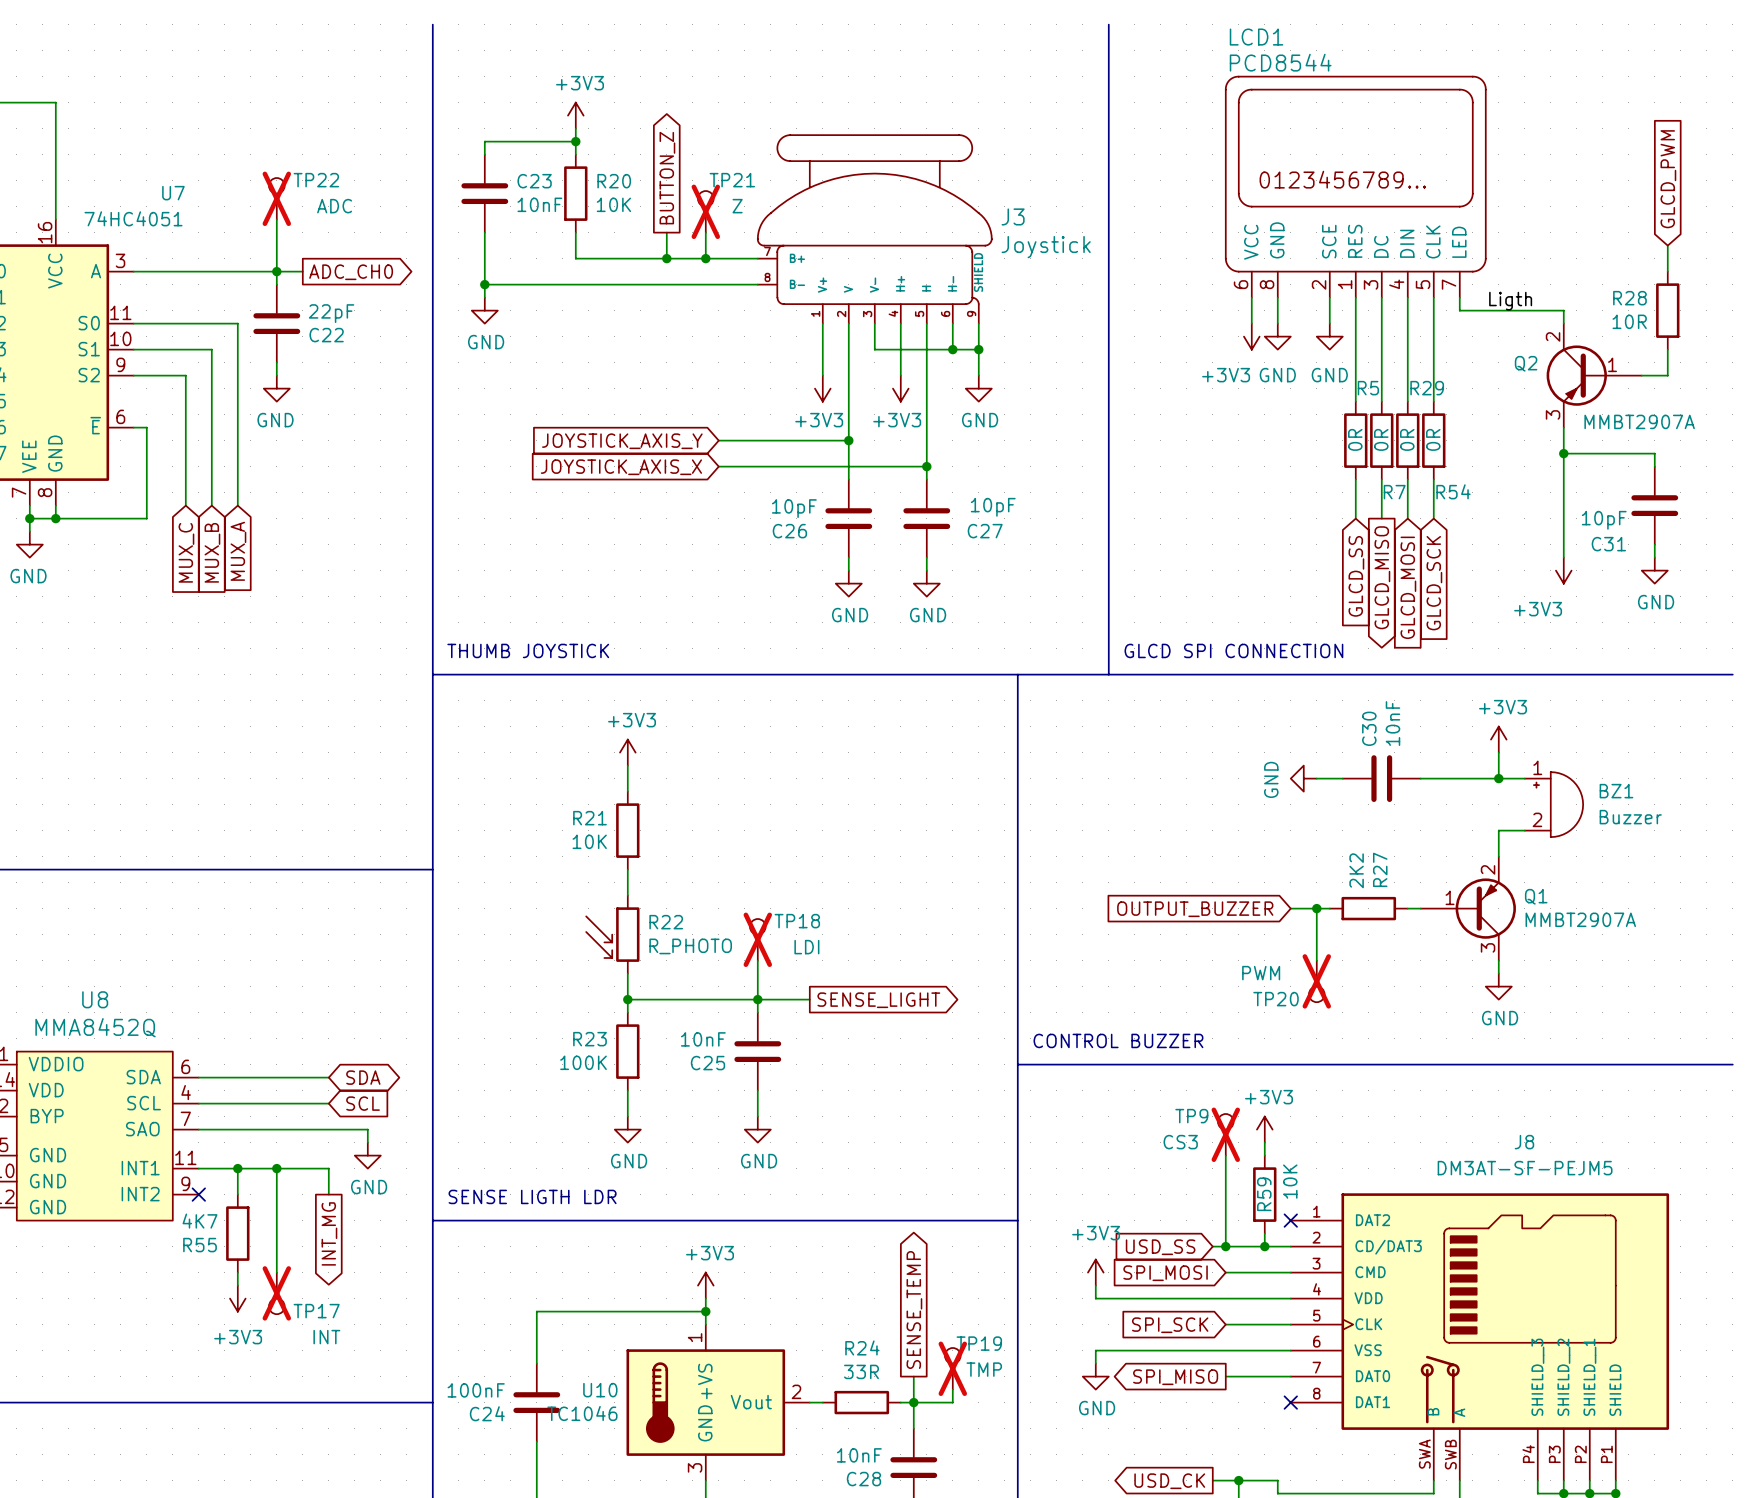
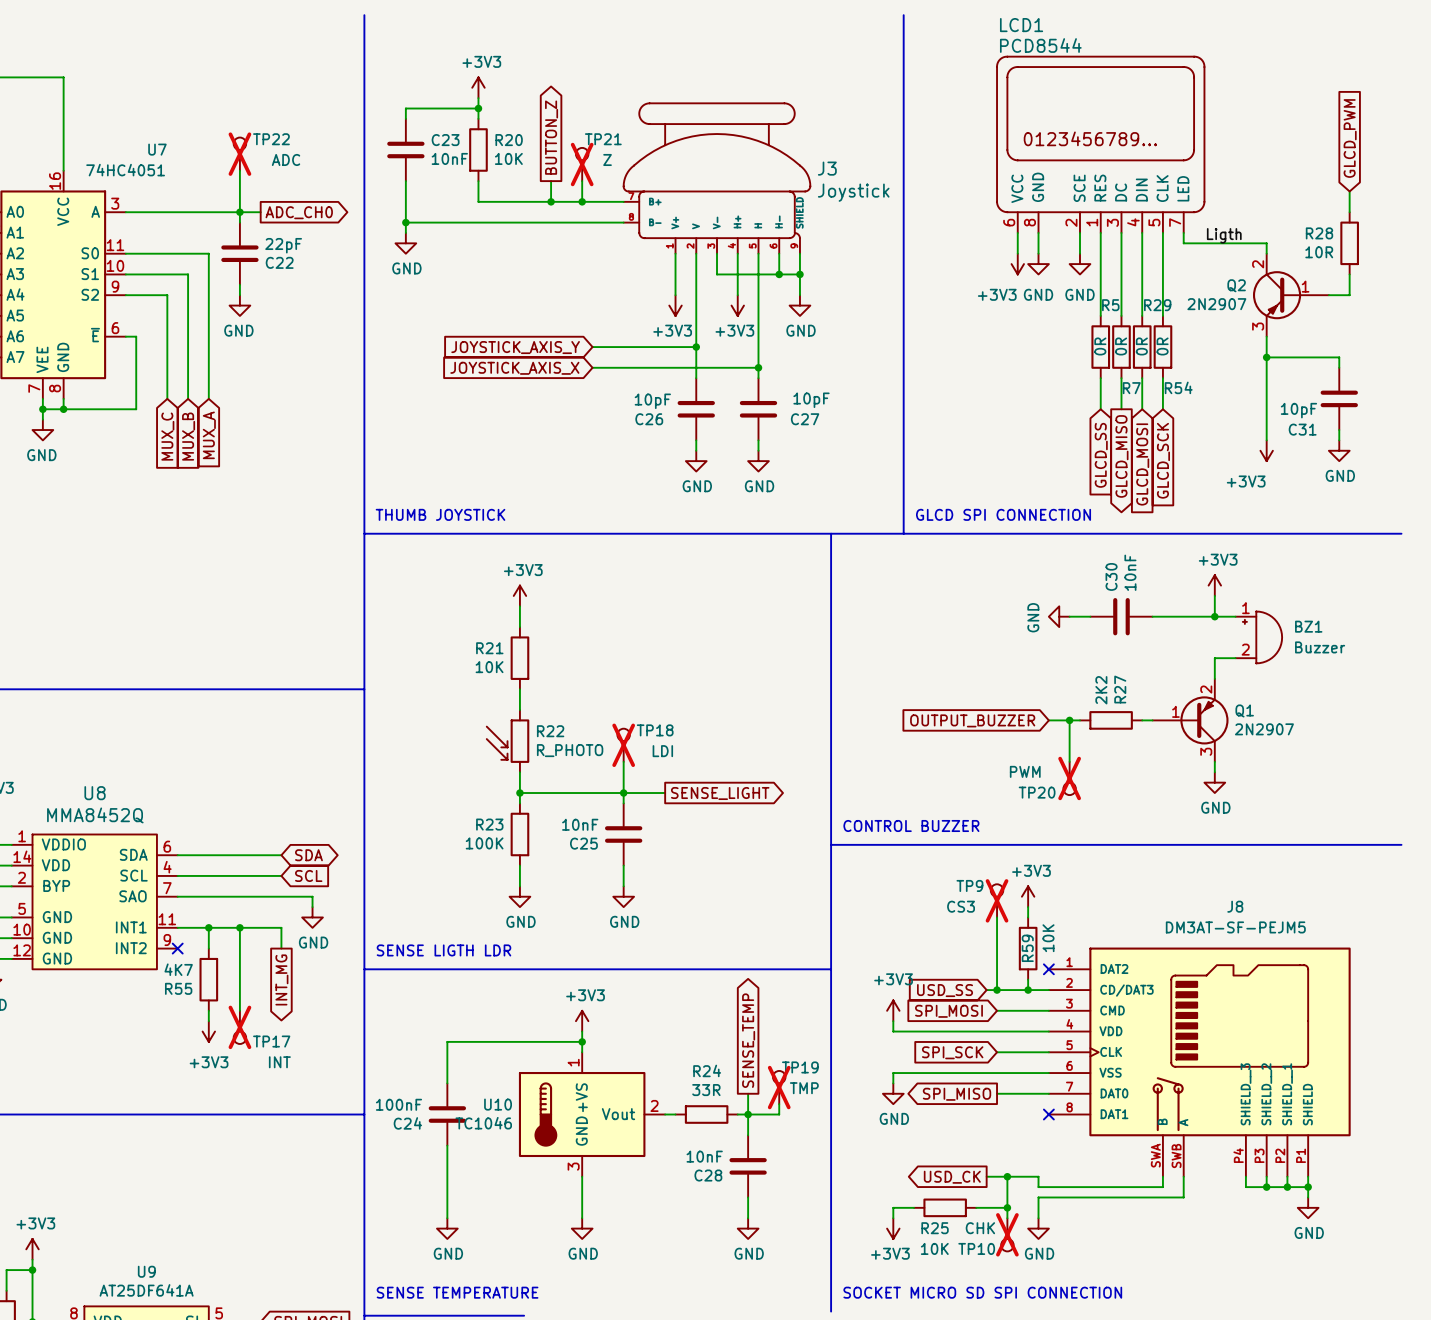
Q2 value: MMBT2907A (1639, 421) -> 2N2907 (1216, 304)
Q1 value: MMBT2907A (1580, 919) -> 2N2907 (1264, 729)

